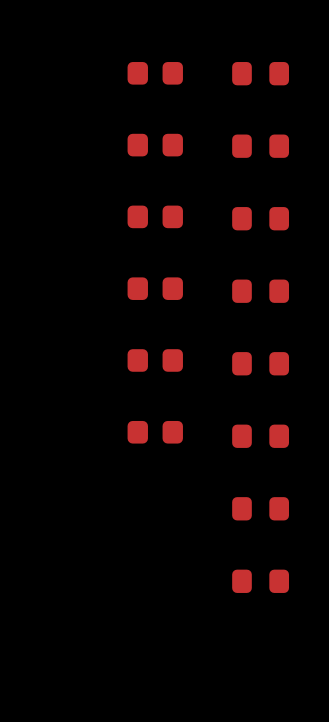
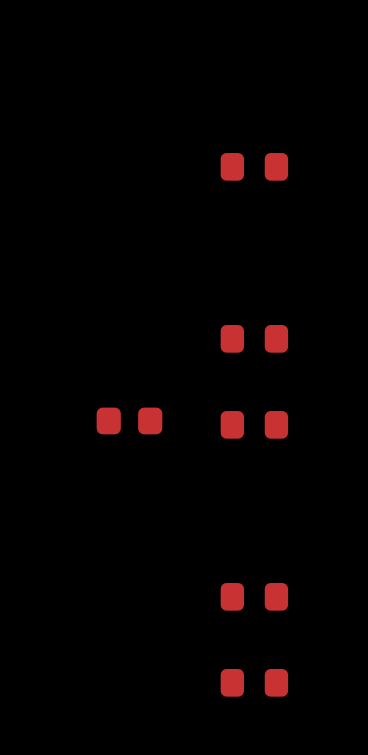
part: (155, 73) -> none
part: (260, 73) -> none
part: (155, 145) -> none
part: (155, 216) -> none
part: (260, 218) -> none
part: (155, 288) -> none
part: (155, 432) -> none
part: (260, 436) -> none

